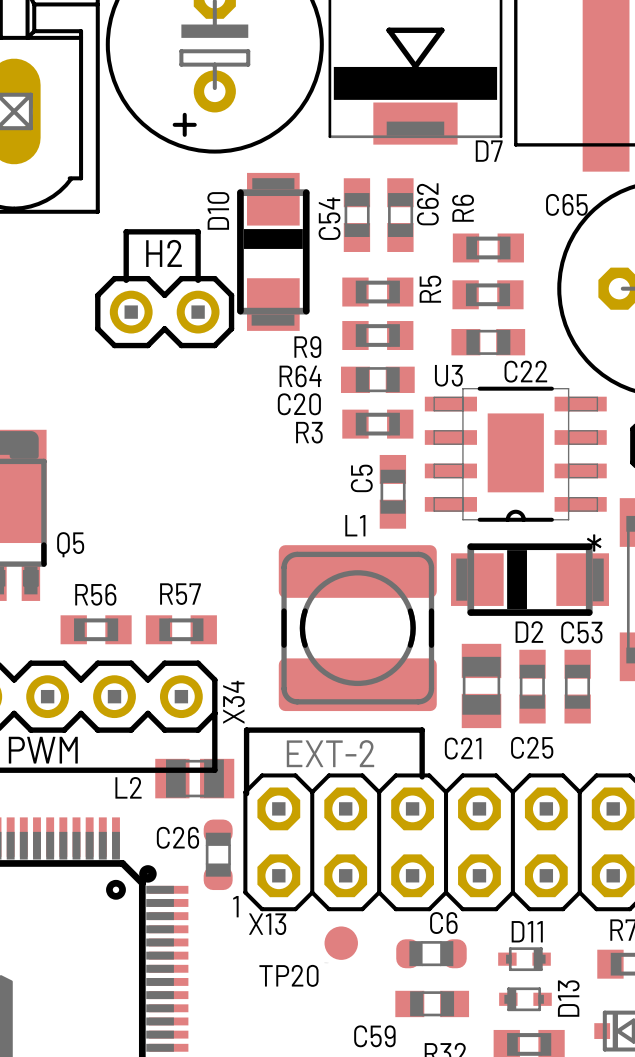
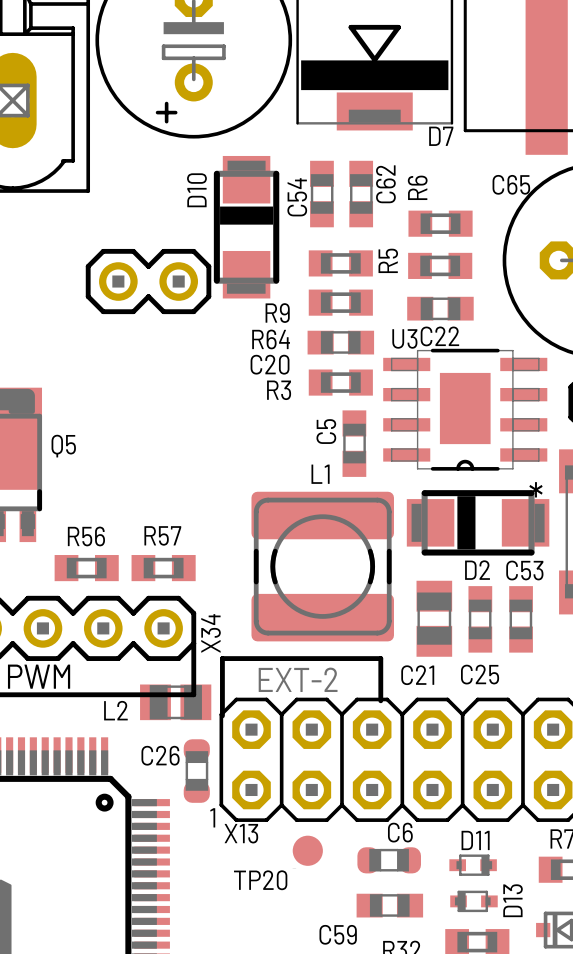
text: H2 (164, 253) -> none
line: (126, 280) (126, 231) (198, 231) (198, 280) -> none
C22 name position: C22 (525, 371) -> C22 (439, 336)
Q5 name position: Q5 (70, 544) -> Q5 (63, 446)
drawing: [139, 865, 157, 883] -> none

